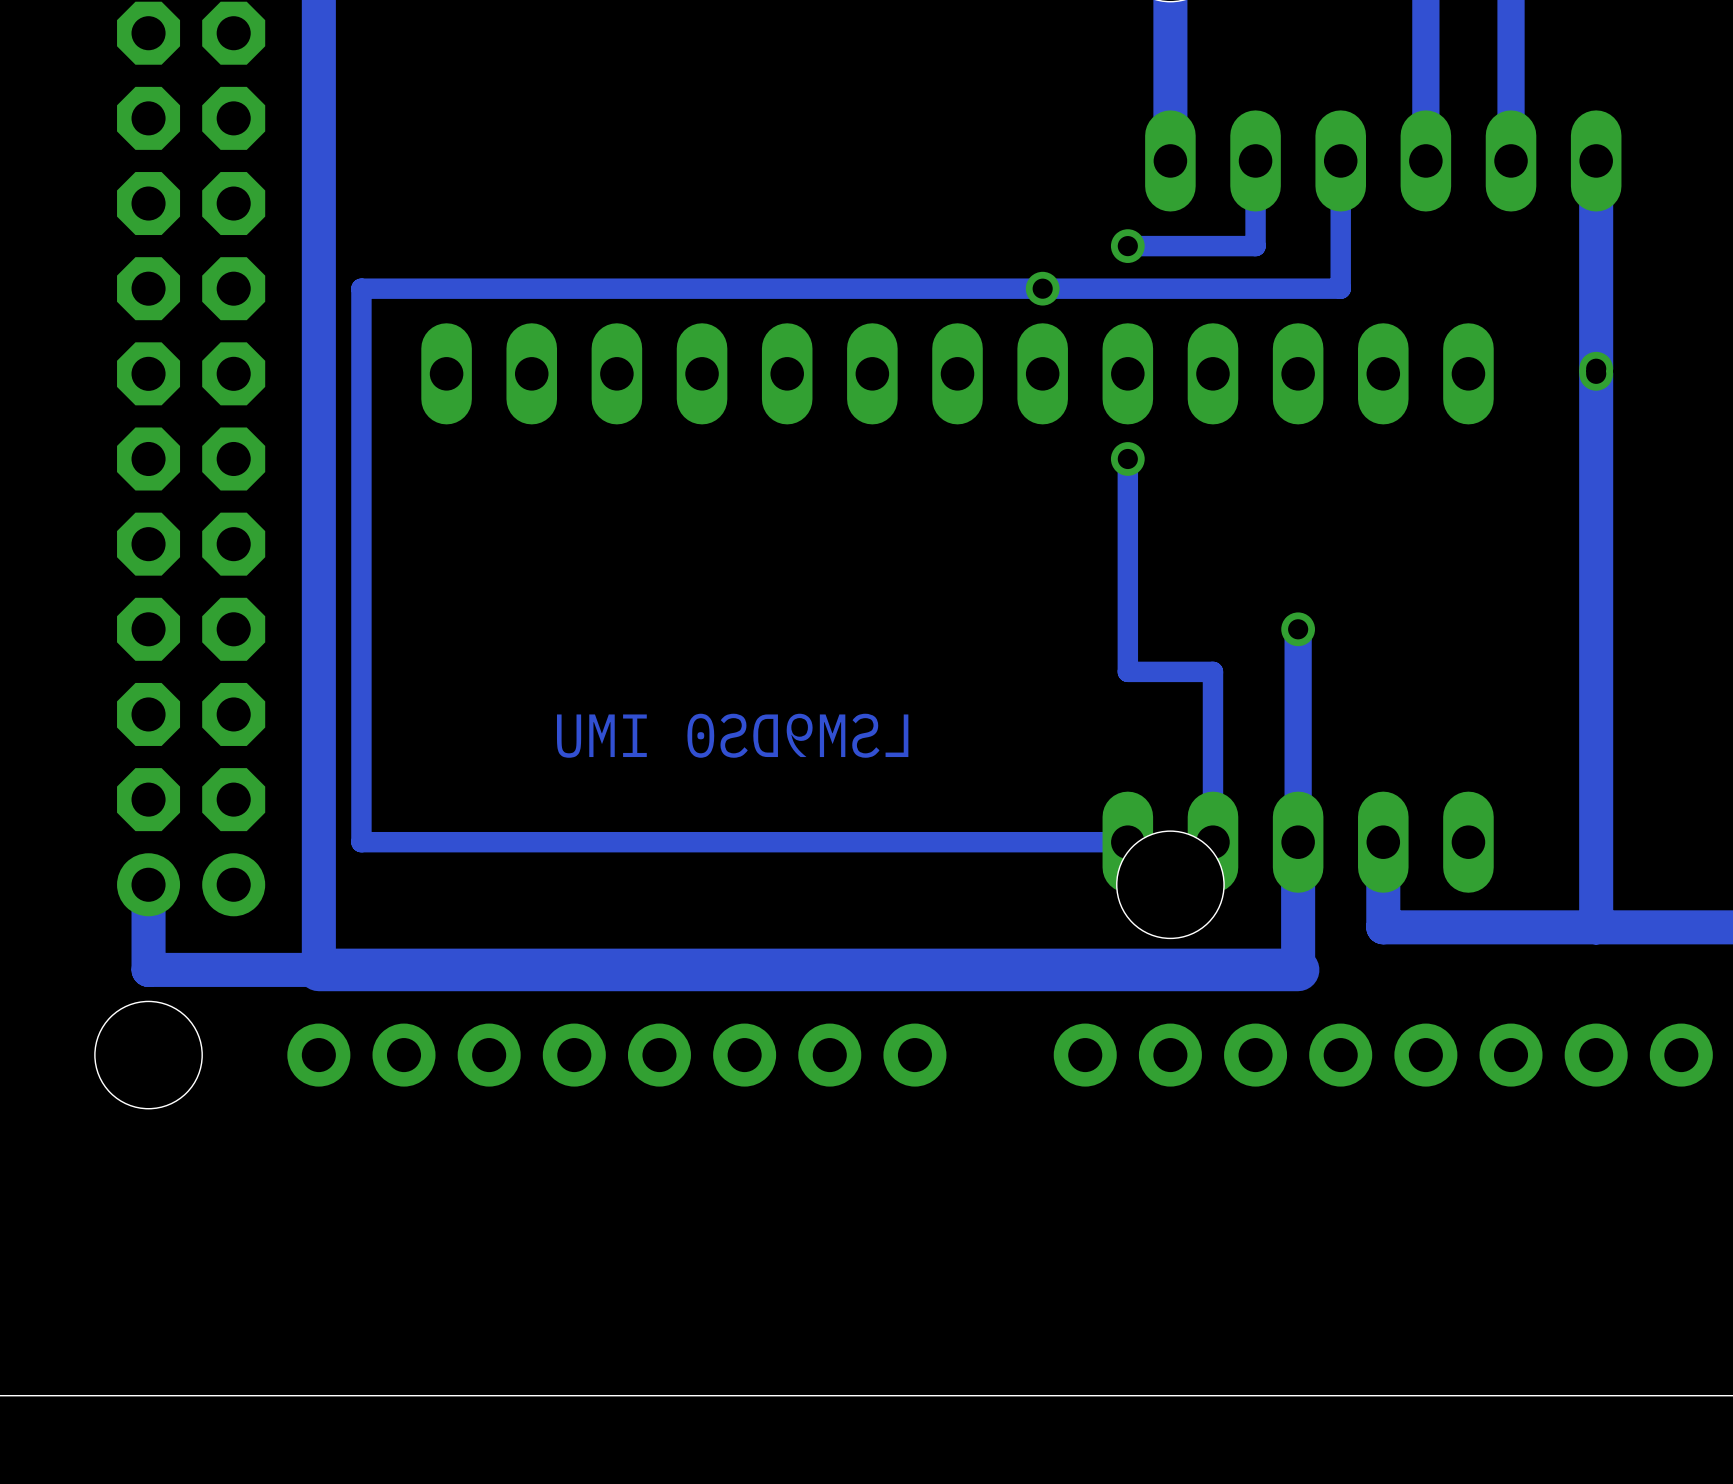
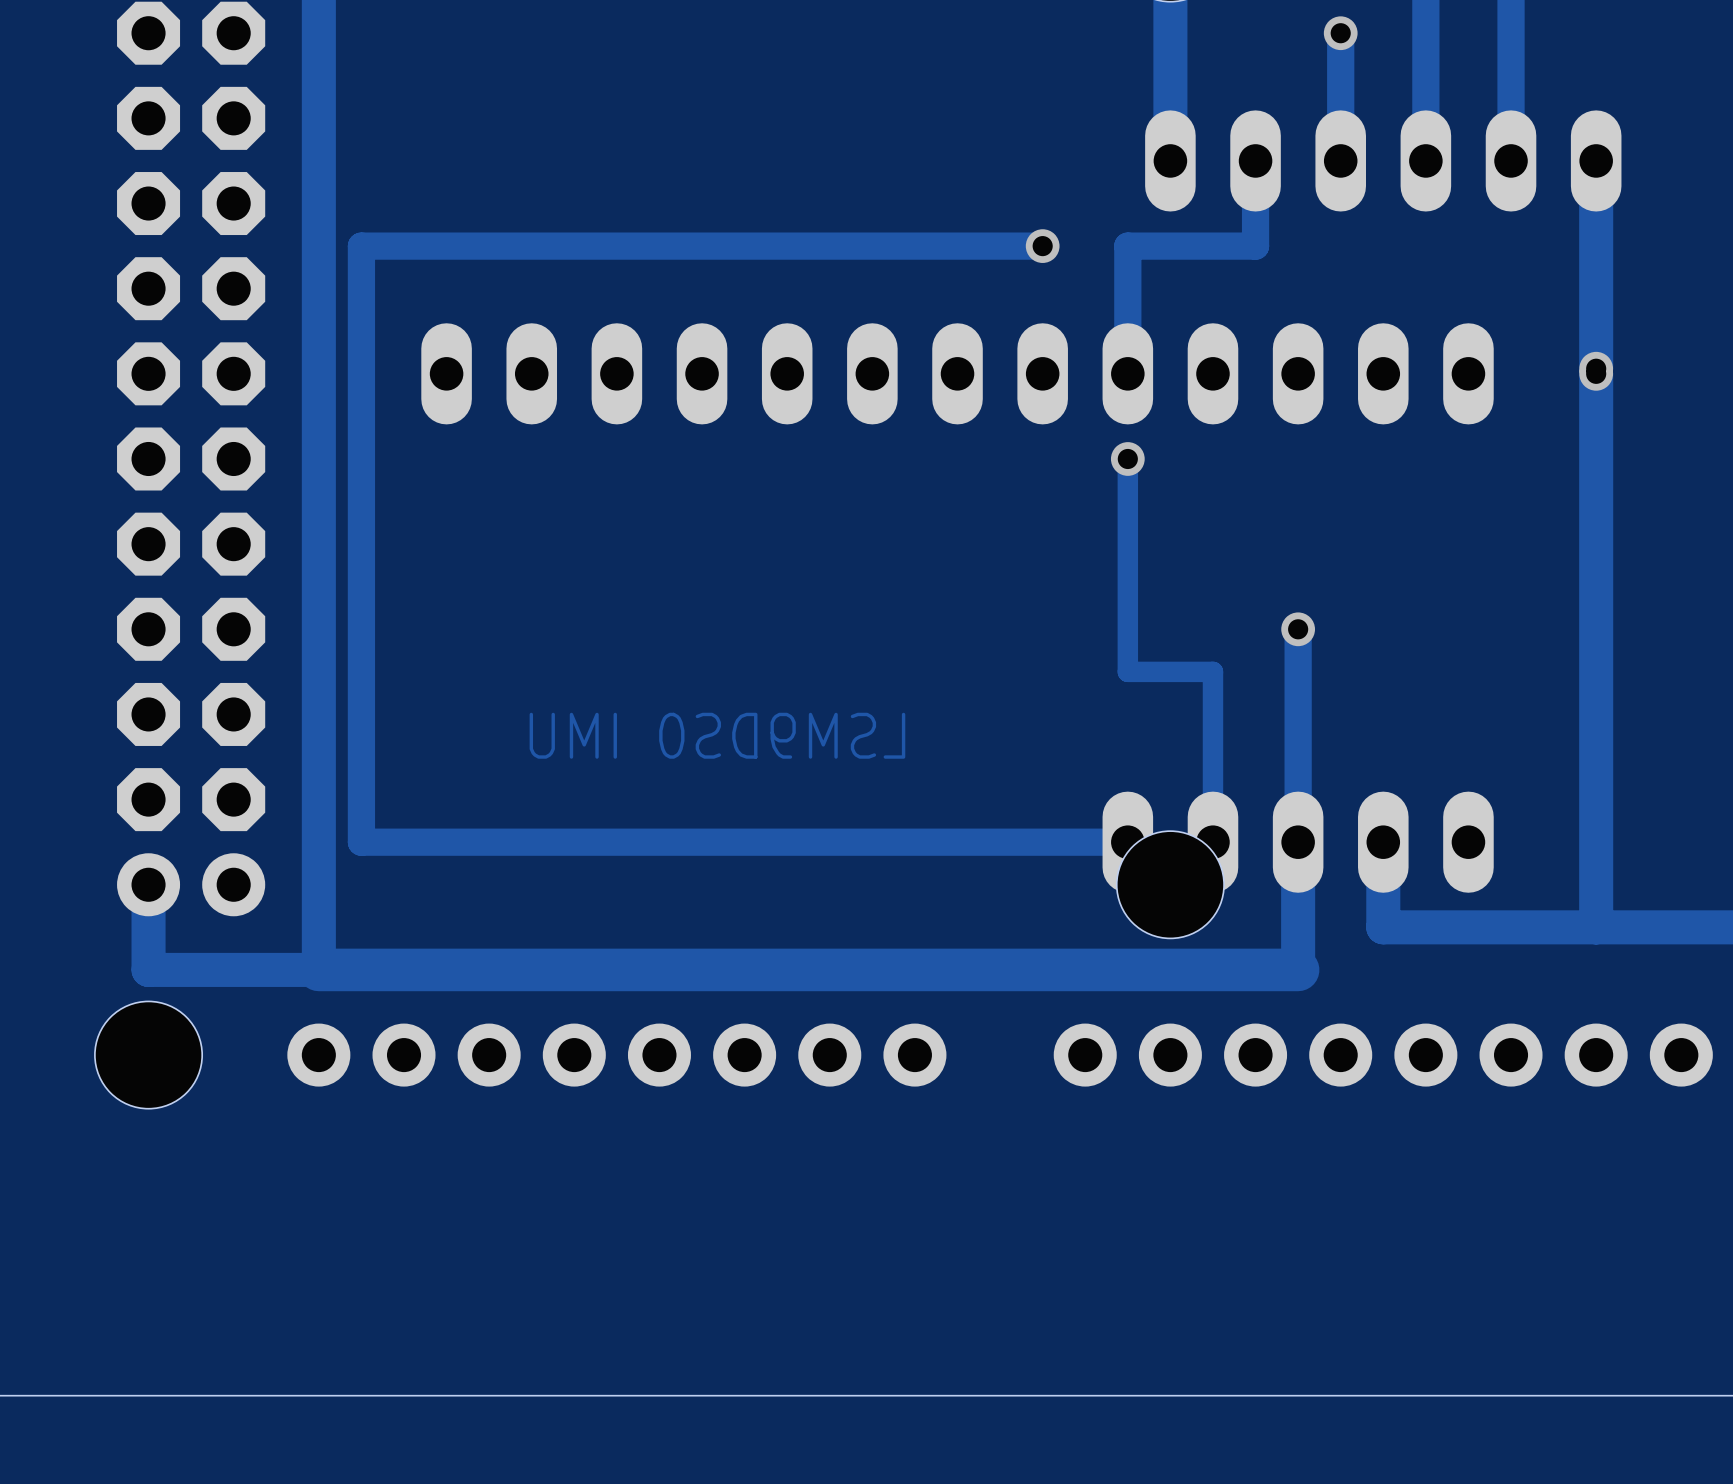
track: none -> (1340, 33) (1340, 160)
via: none -> (1340, 33)
track width: thin (1255, 160) (1255, 246) (1127, 246) -> thick (1255, 160) (1255, 246) (1127, 246)
track: (1340, 160) (1340, 288) (361, 288) -> (1042, 246) (361, 246) (361, 288)
via: none -> (1042, 246)
track: none -> (1127, 246) (1127, 373)
via: (1127, 246) -> none
track width: thin (361, 288) (361, 842) (1127, 842) -> thick (361, 288) (361, 842) (1127, 842)
via: (1042, 288) -> none

